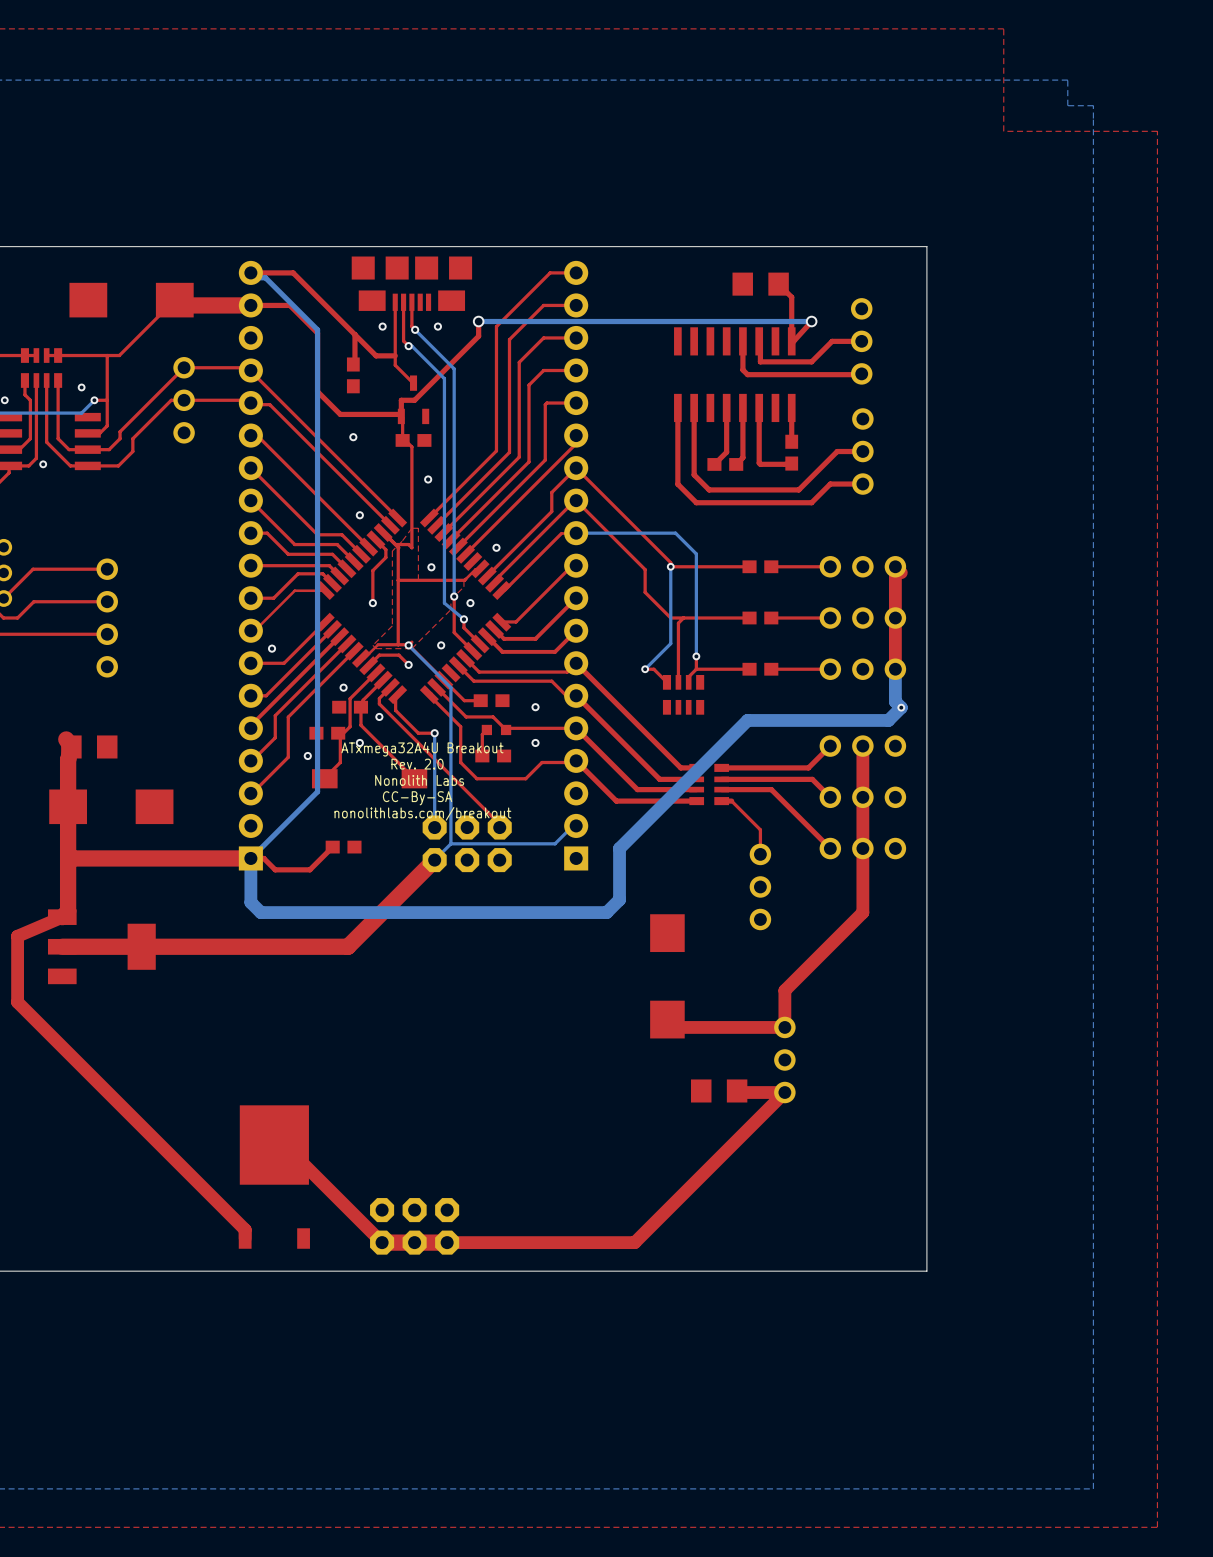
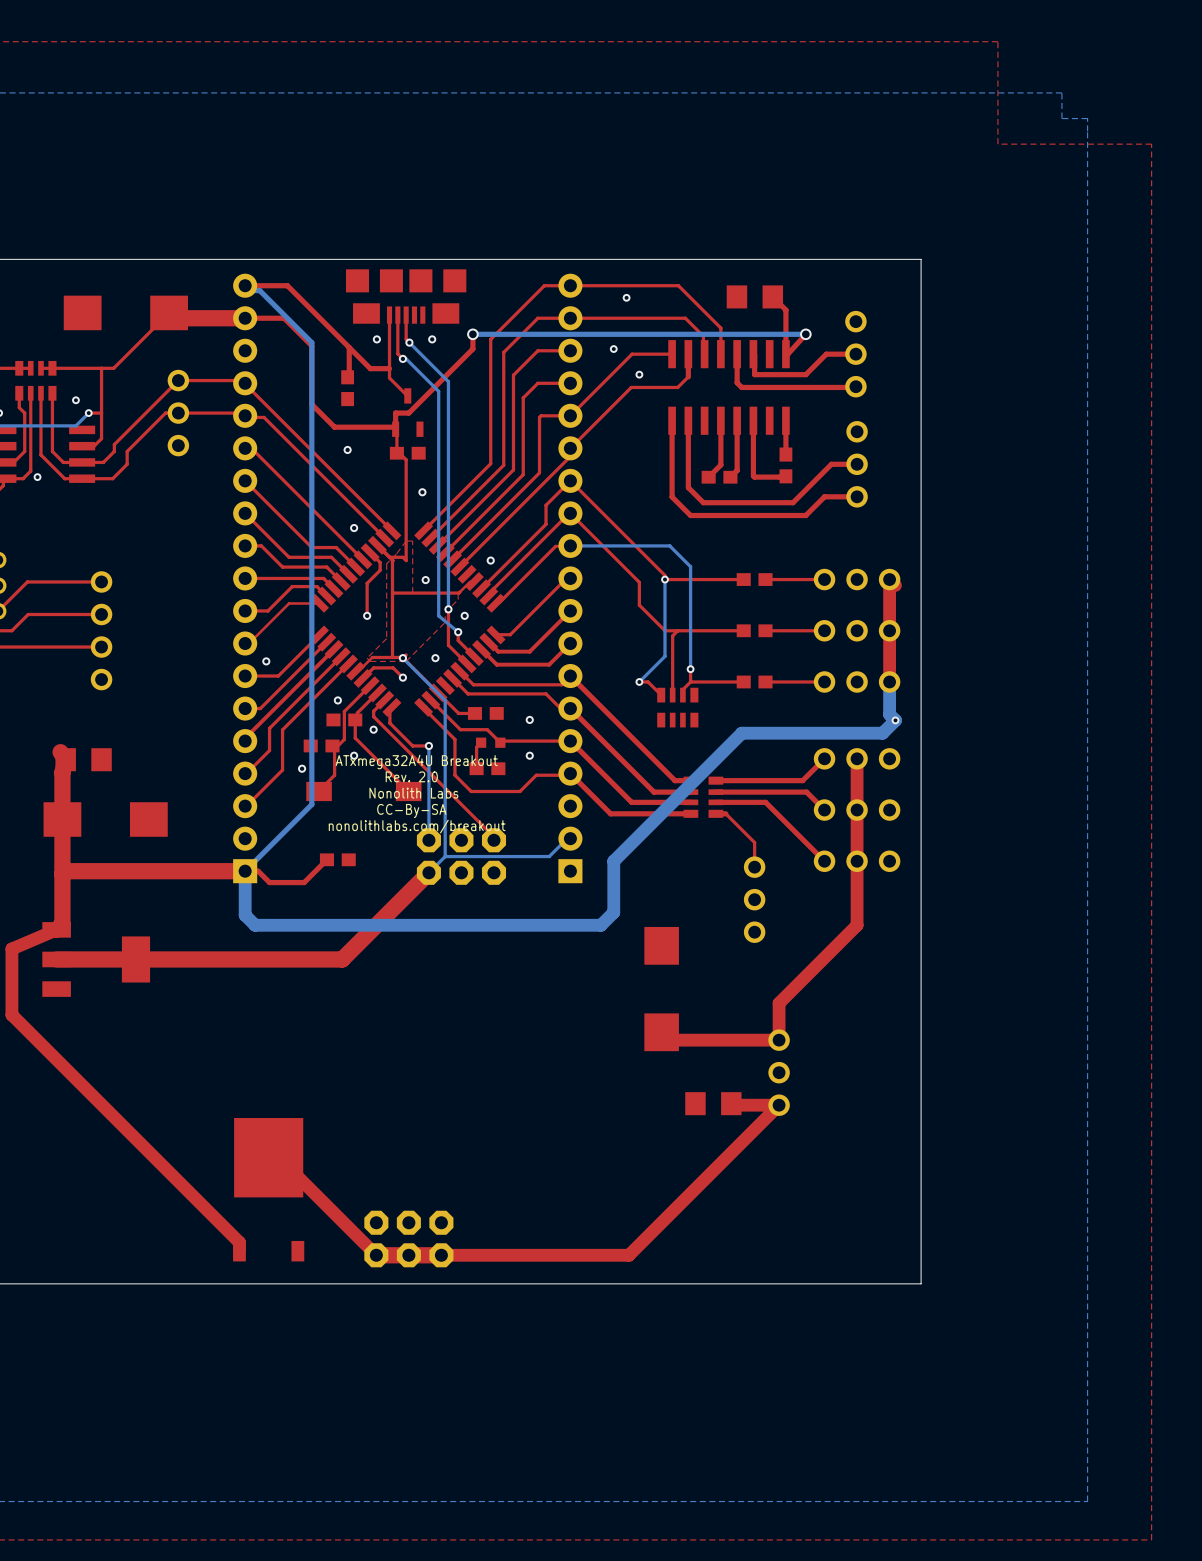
top track: none -> (570, 285) (678, 285) (720, 328) (720, 354)
via: none -> (626, 297)
top track: none -> (570, 318) (685, 318) (703, 336) (704, 354)
via: none -> (613, 349)
top track: none -> (672, 354) (632, 354) (570, 415)
top track: none -> (688, 354) (688, 376) (677, 387) (631, 387) (570, 448)
via: none -> (639, 374)

